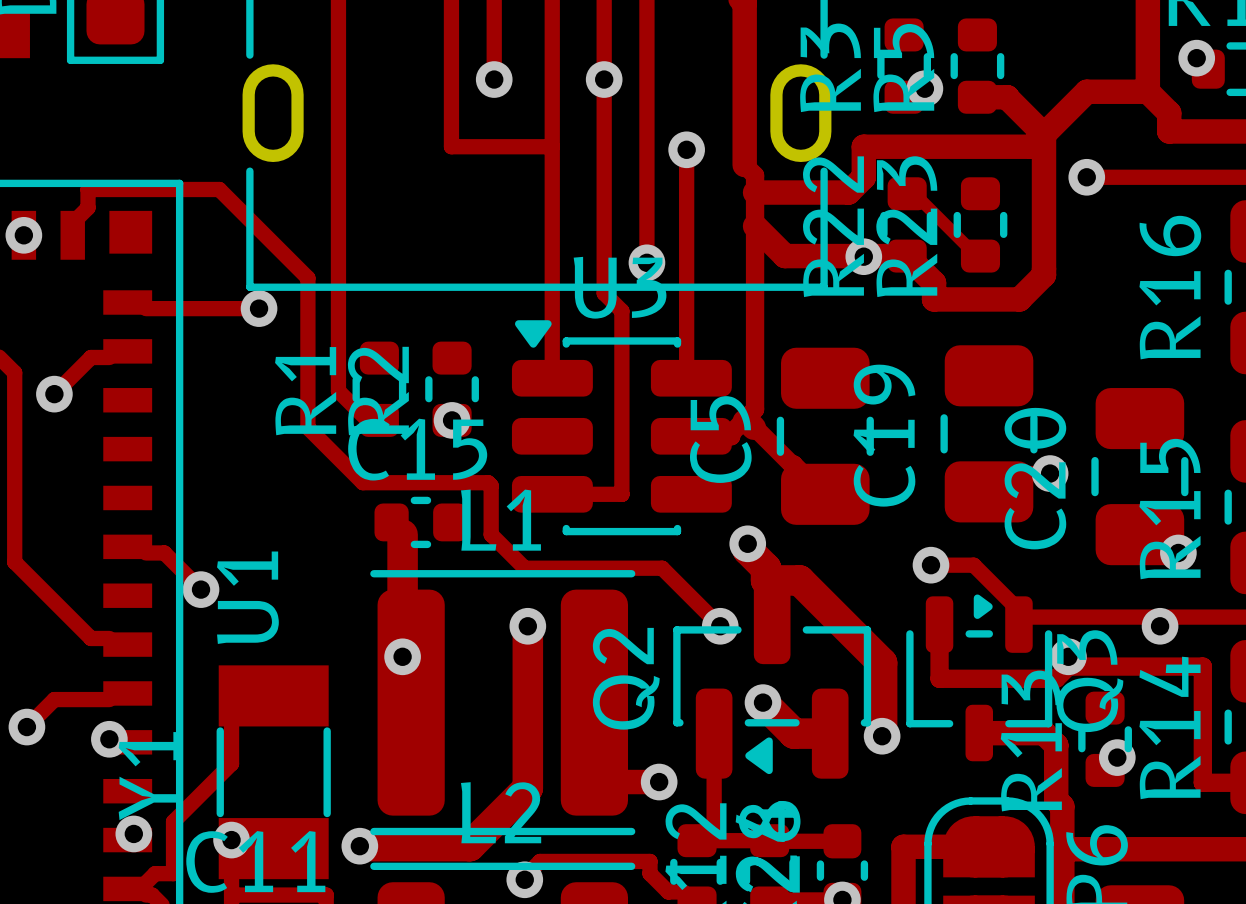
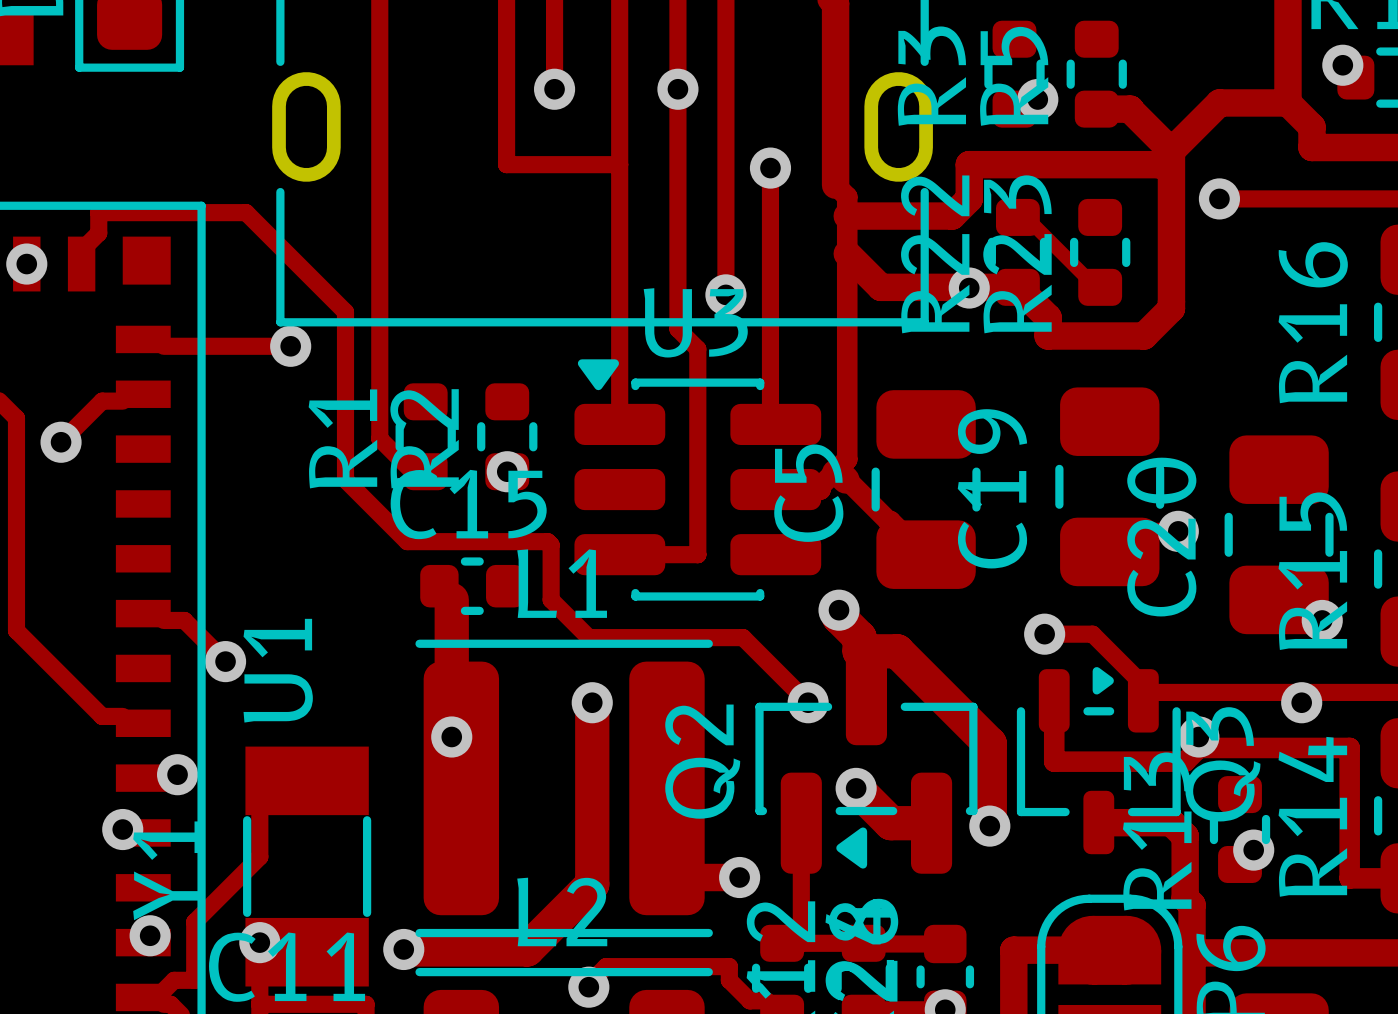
track: (109, 699) (54, 699) (26, 727) -> none
via position: (26, 727) -> (177, 774)

